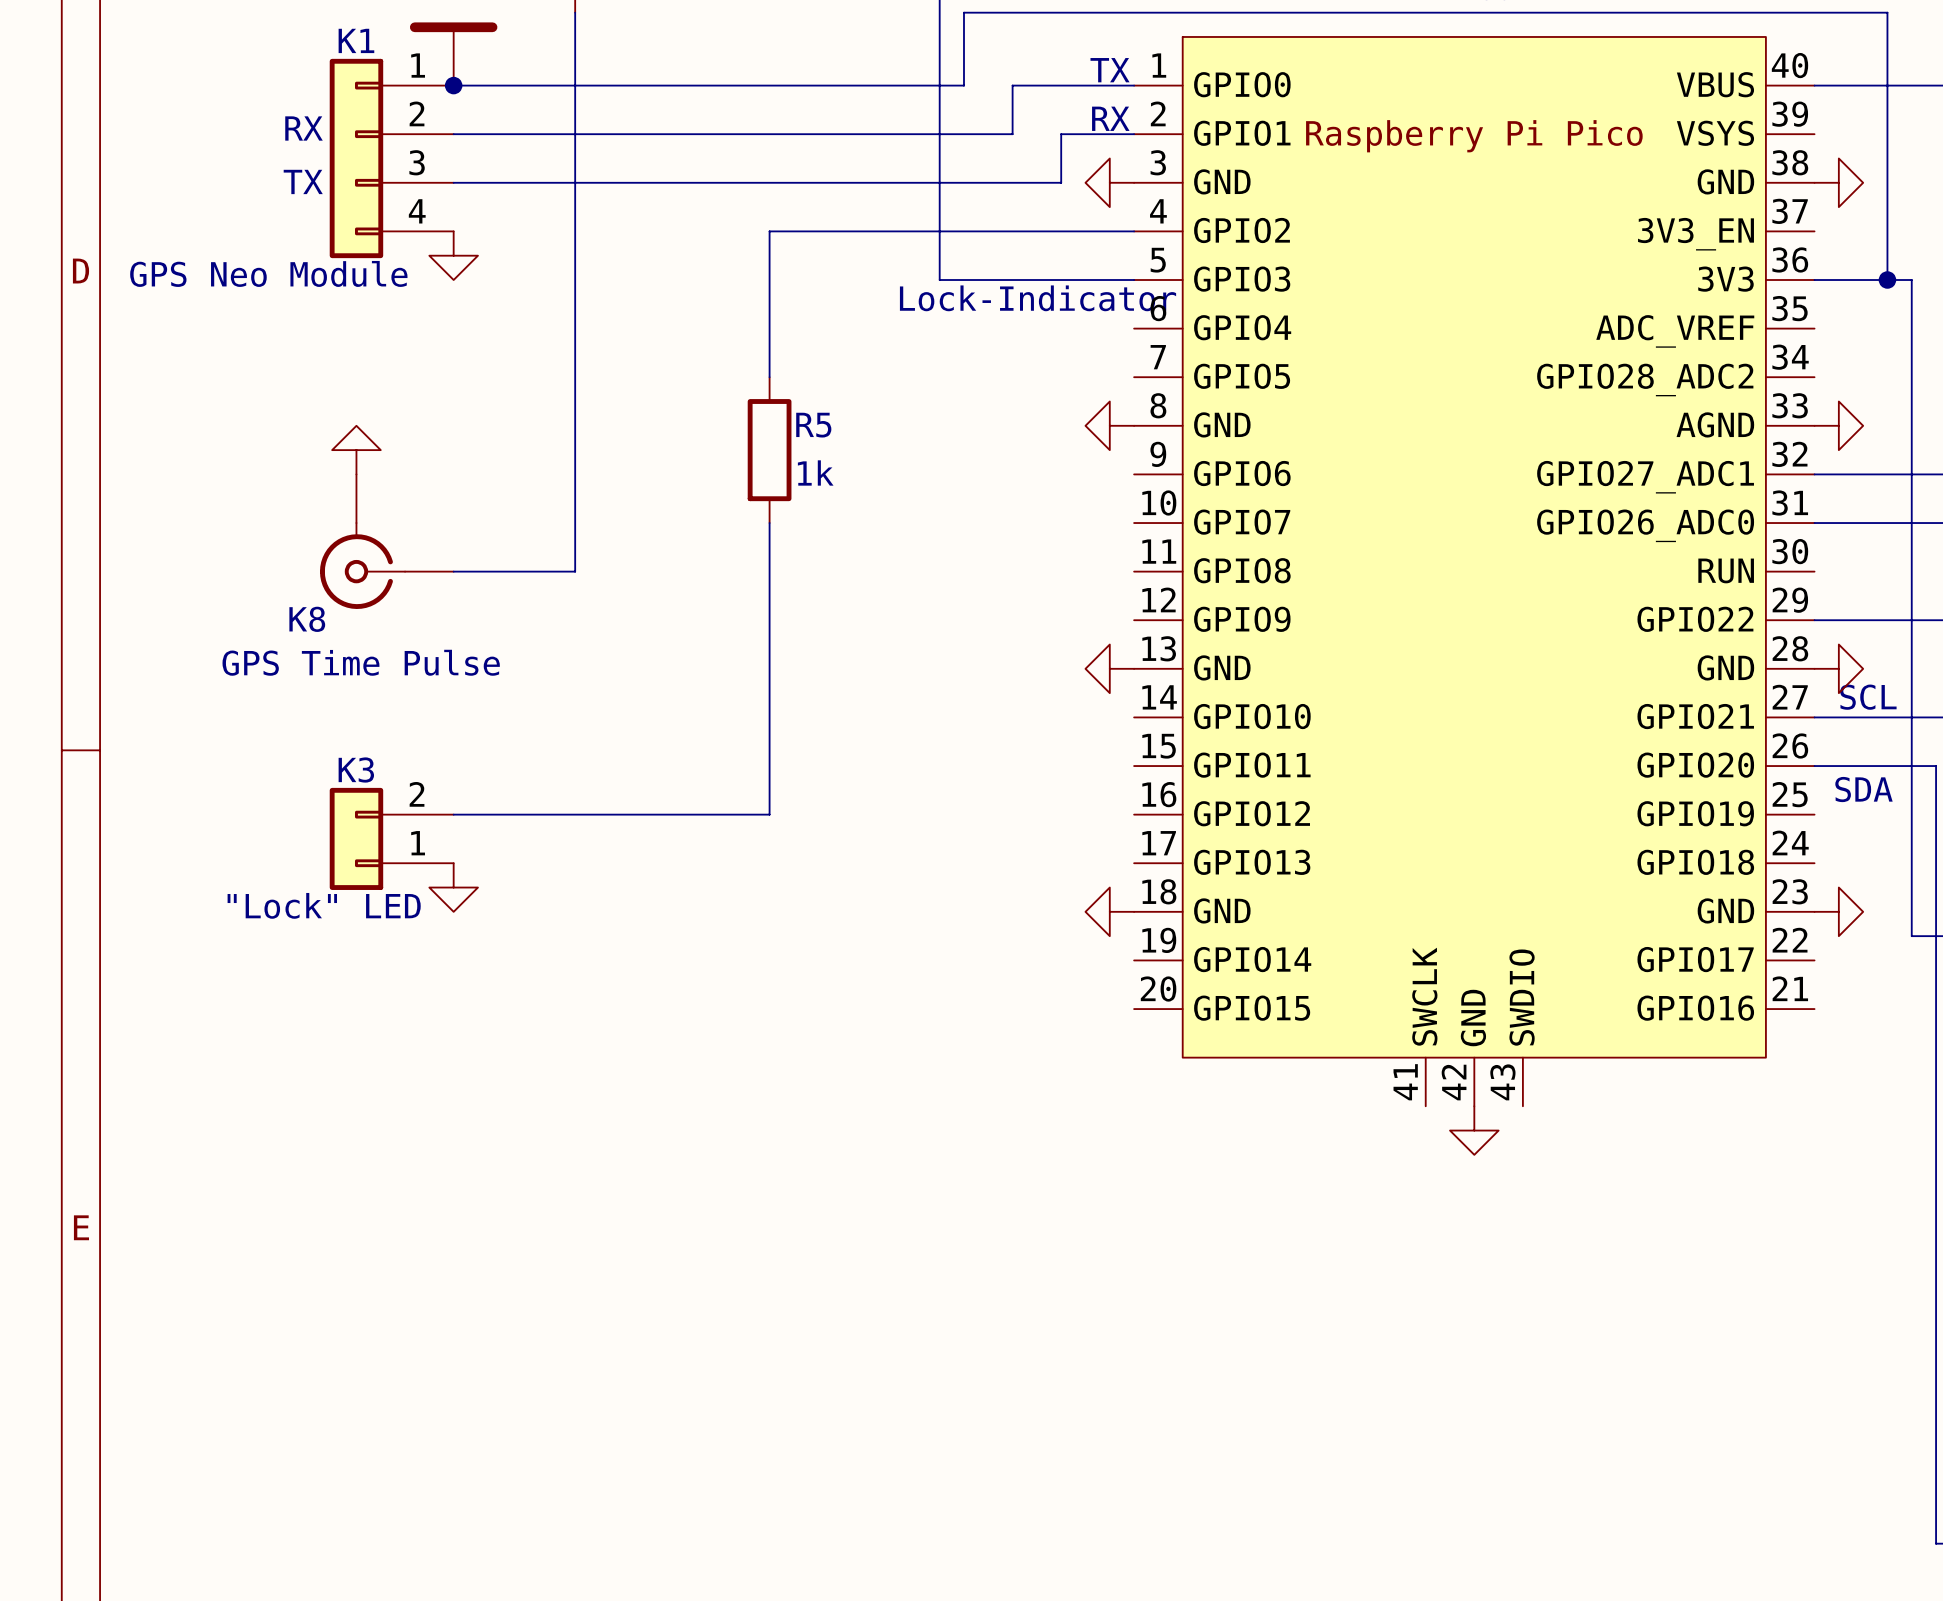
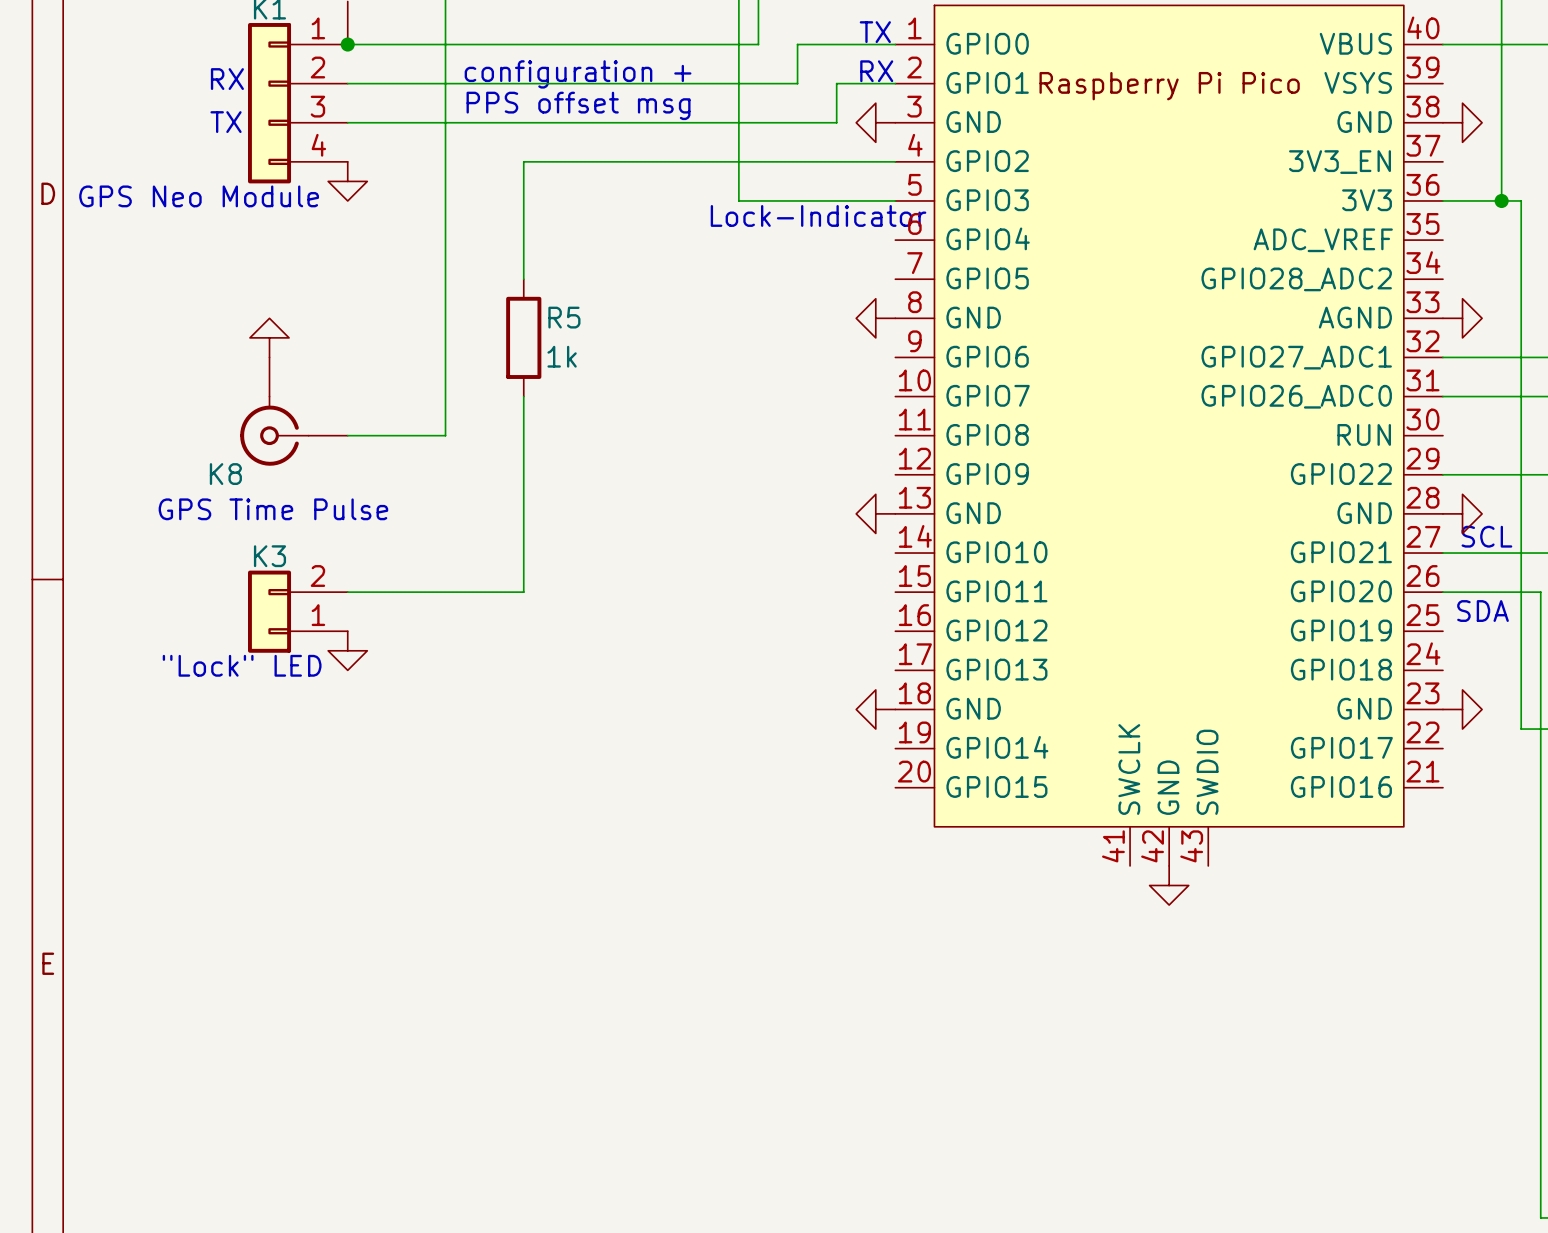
text: none -> configuration + (578, 74)
text: none -> PPS offset msg (578, 105)
wire: (769, 231) (769, 377) -> (601, 161) (523, 161) (523, 279)
R5 position: (769, 450) -> (523, 337)
wire: none -> (523, 396) (523, 592) (347, 592)
wire: (769, 523) (769, 814) (453, 814) -> none
K3 position: (391, 838) -> (297, 611)
power symbol position: (453, 887) -> (347, 650)
text position: "Lock" LED (324, 905) -> "Lock" LED (242, 665)

